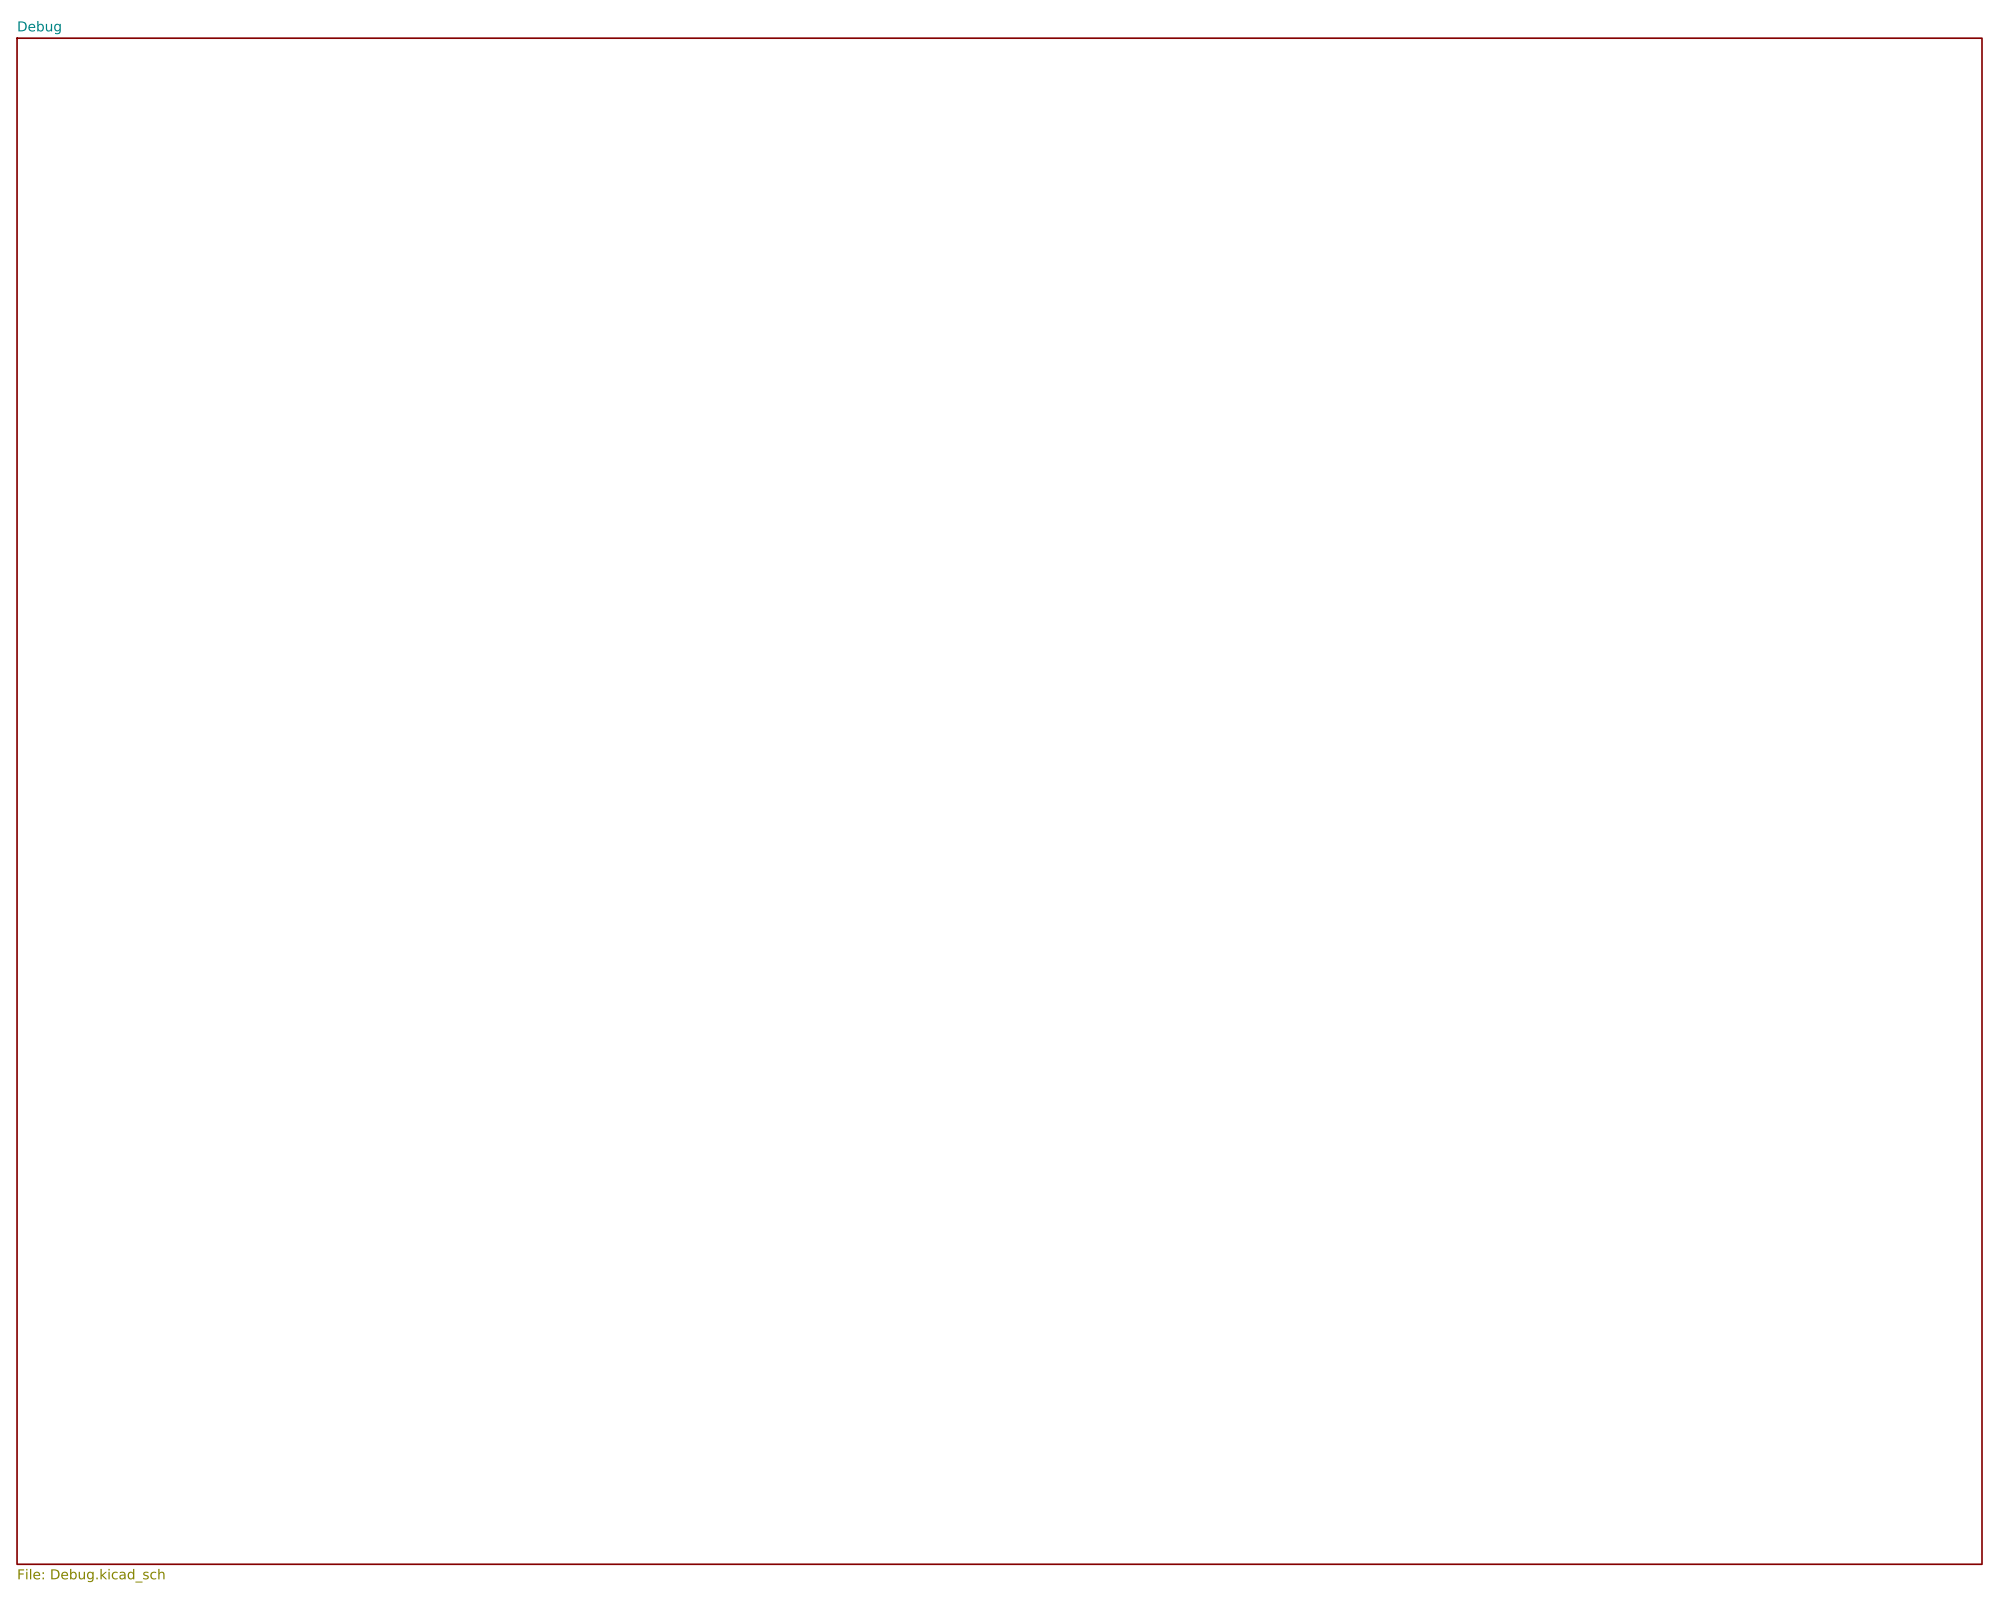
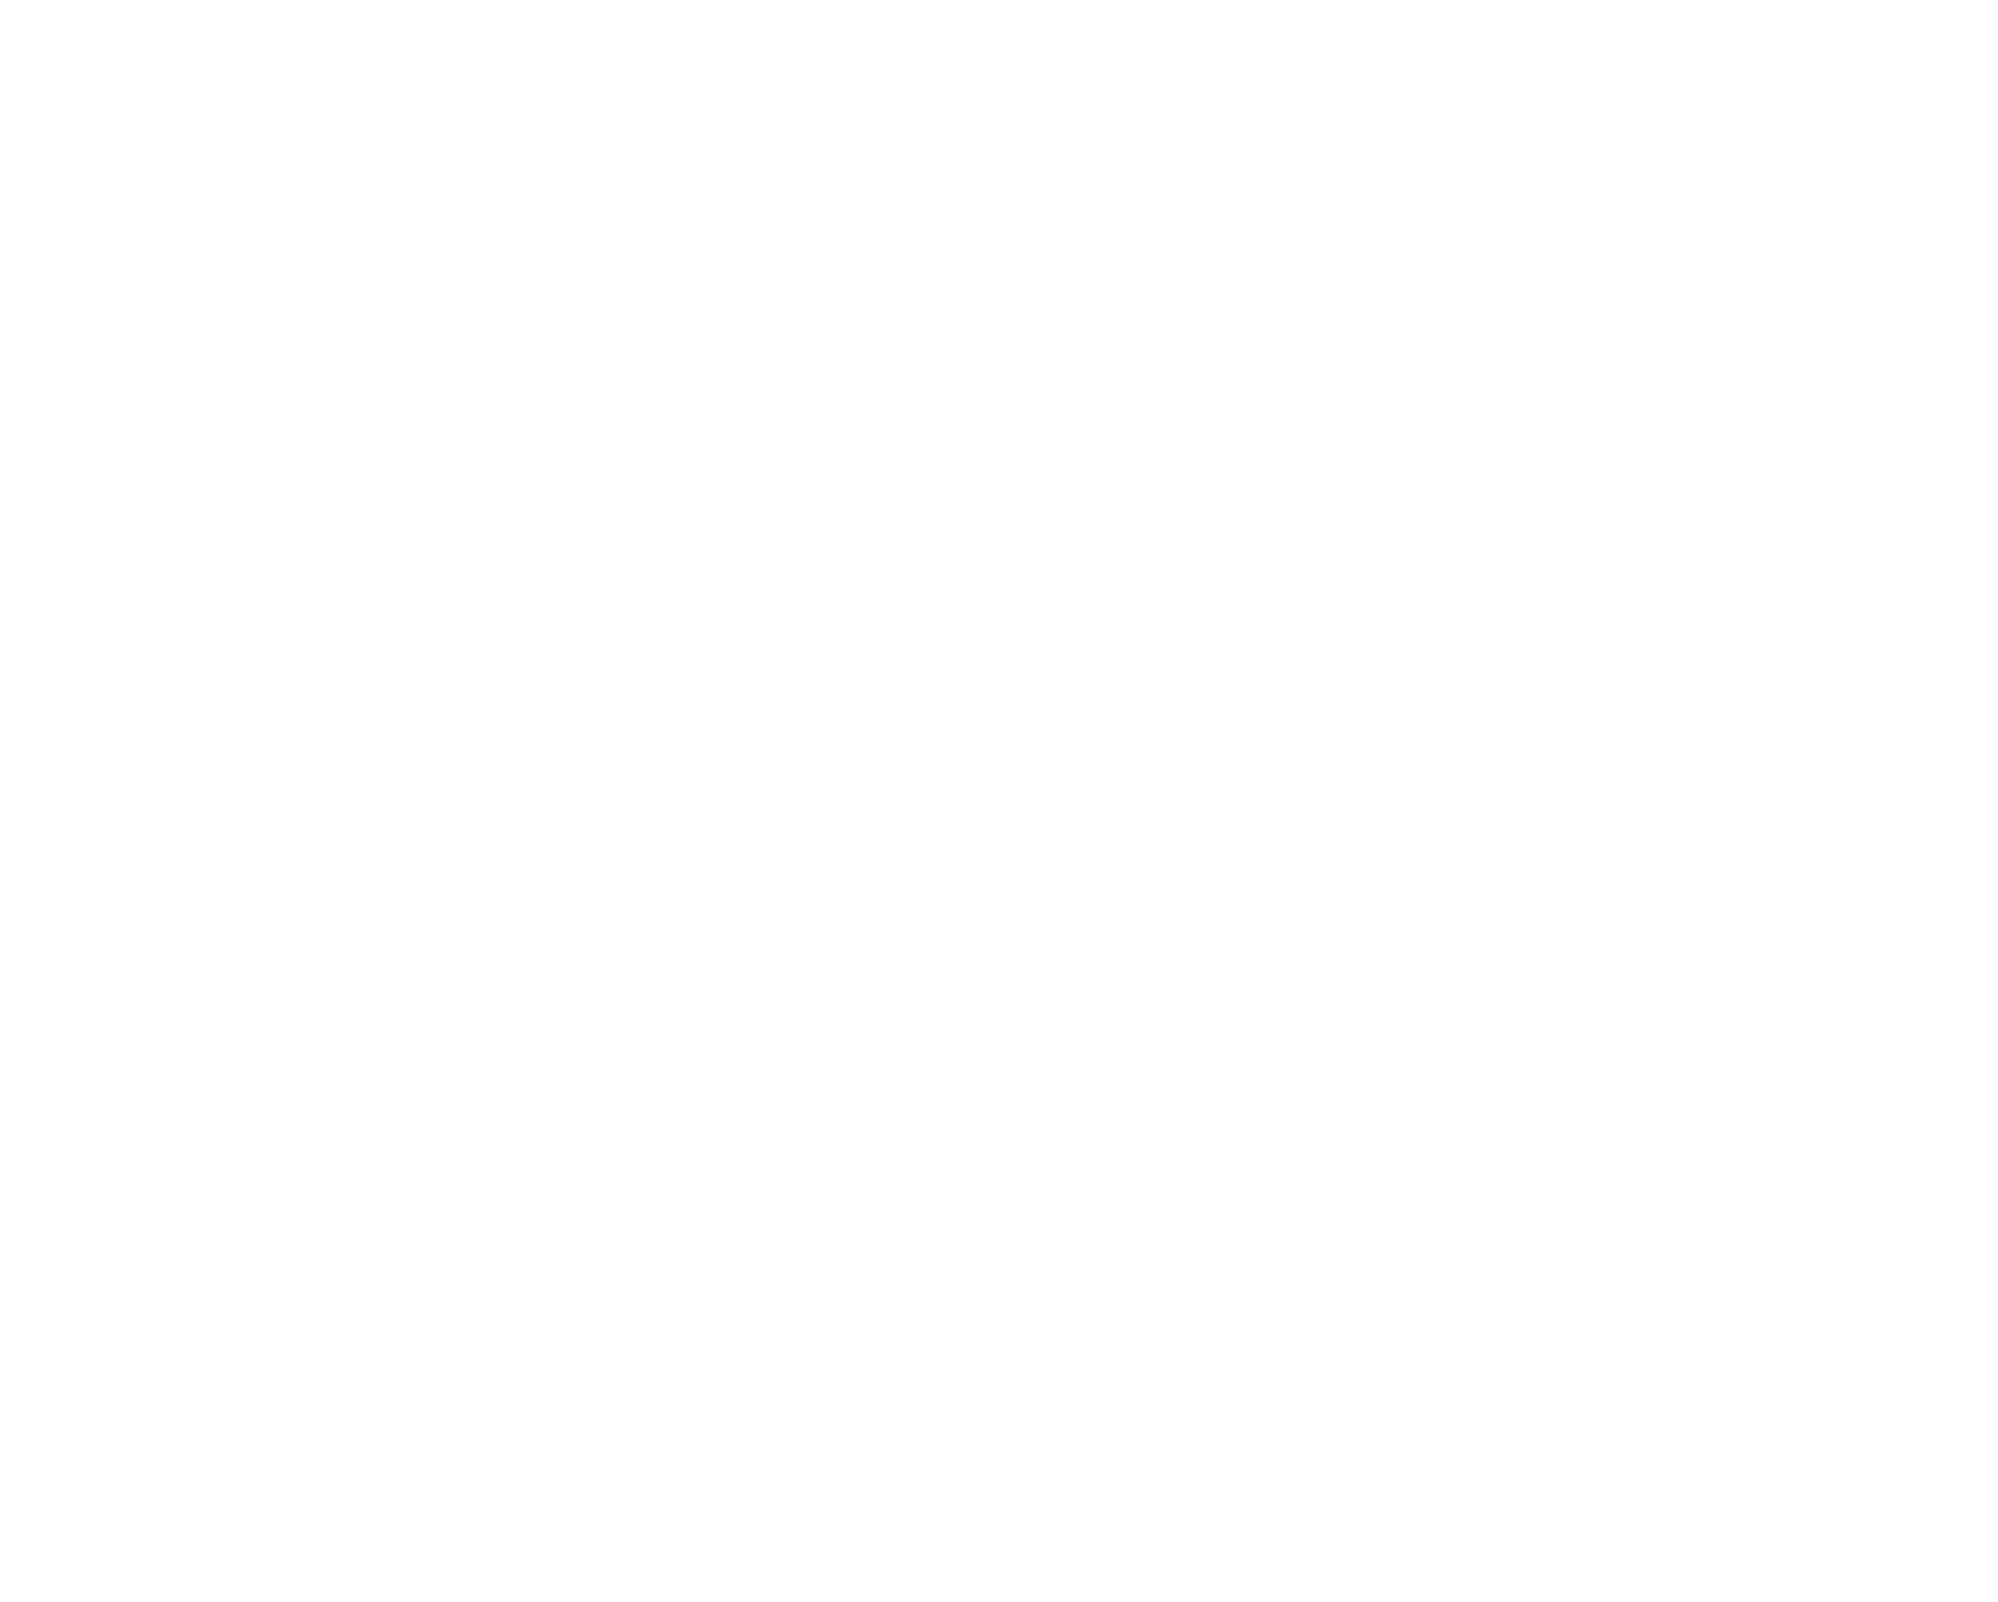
sheet Debug: File: Debug.kicad_sch (999, 801) -> none

